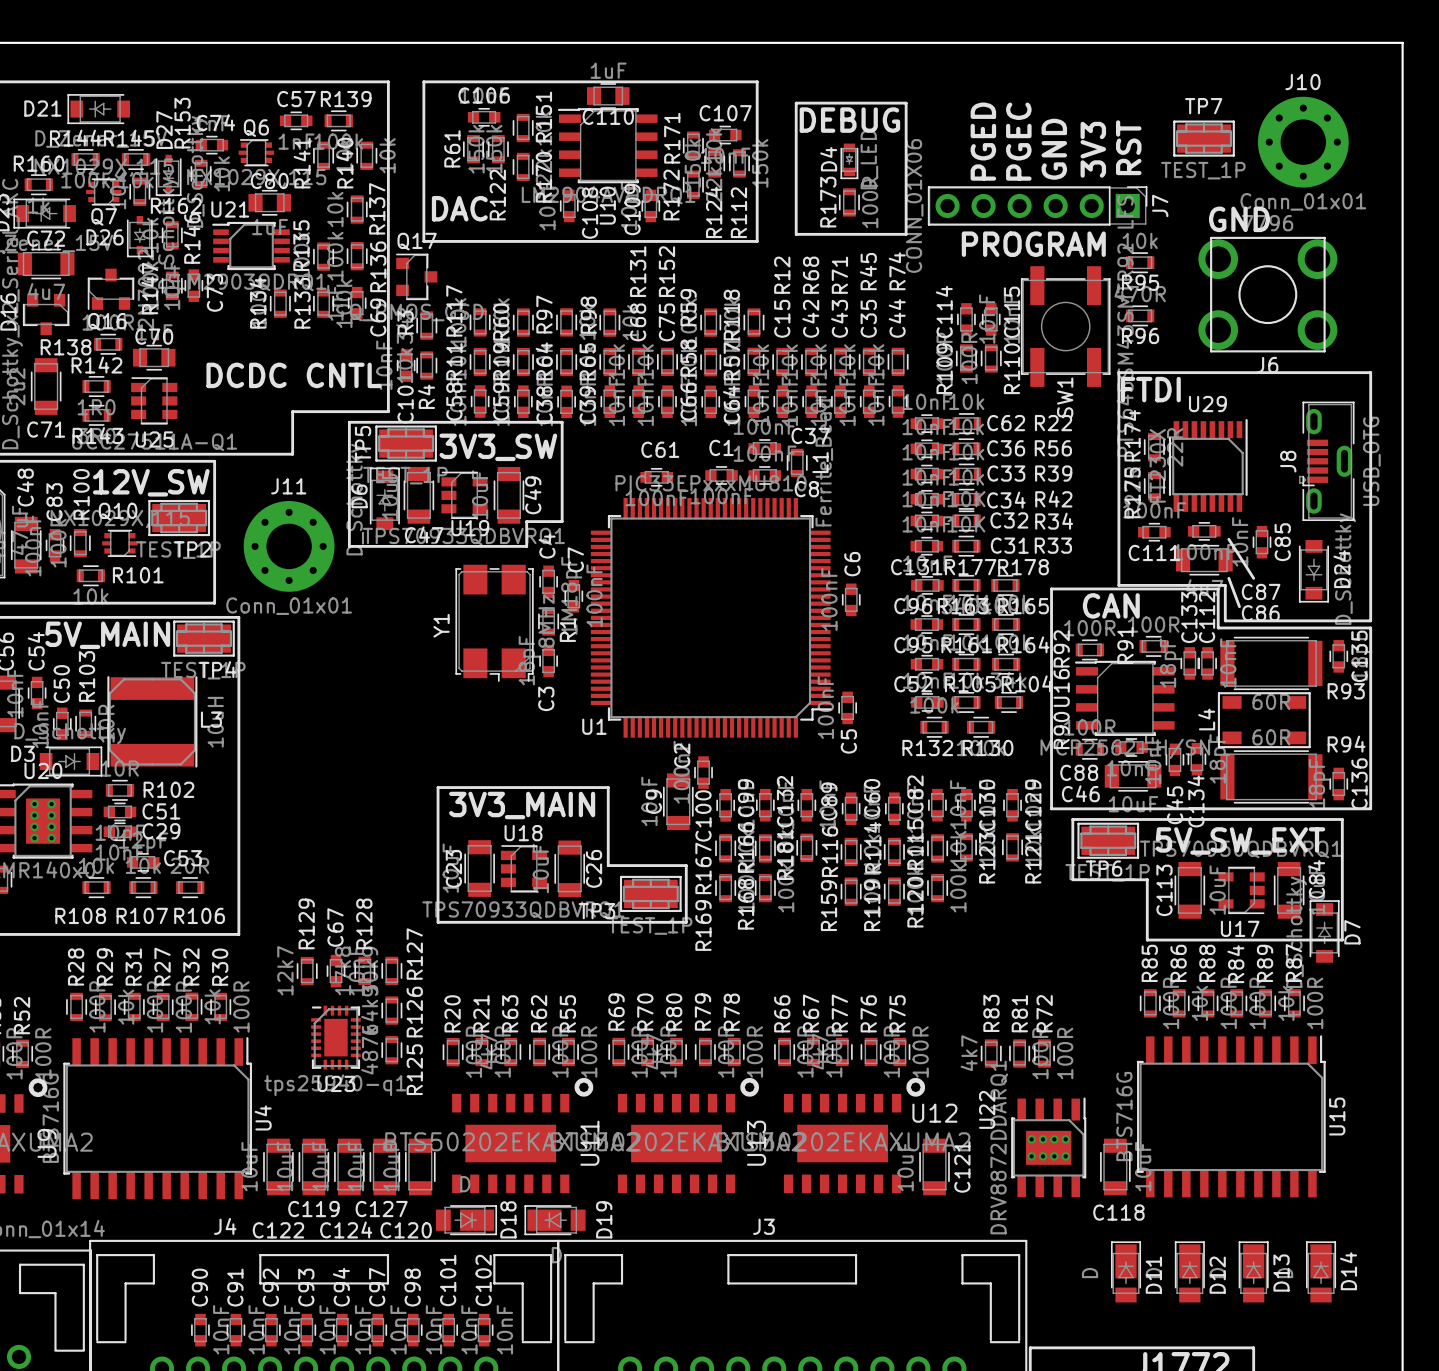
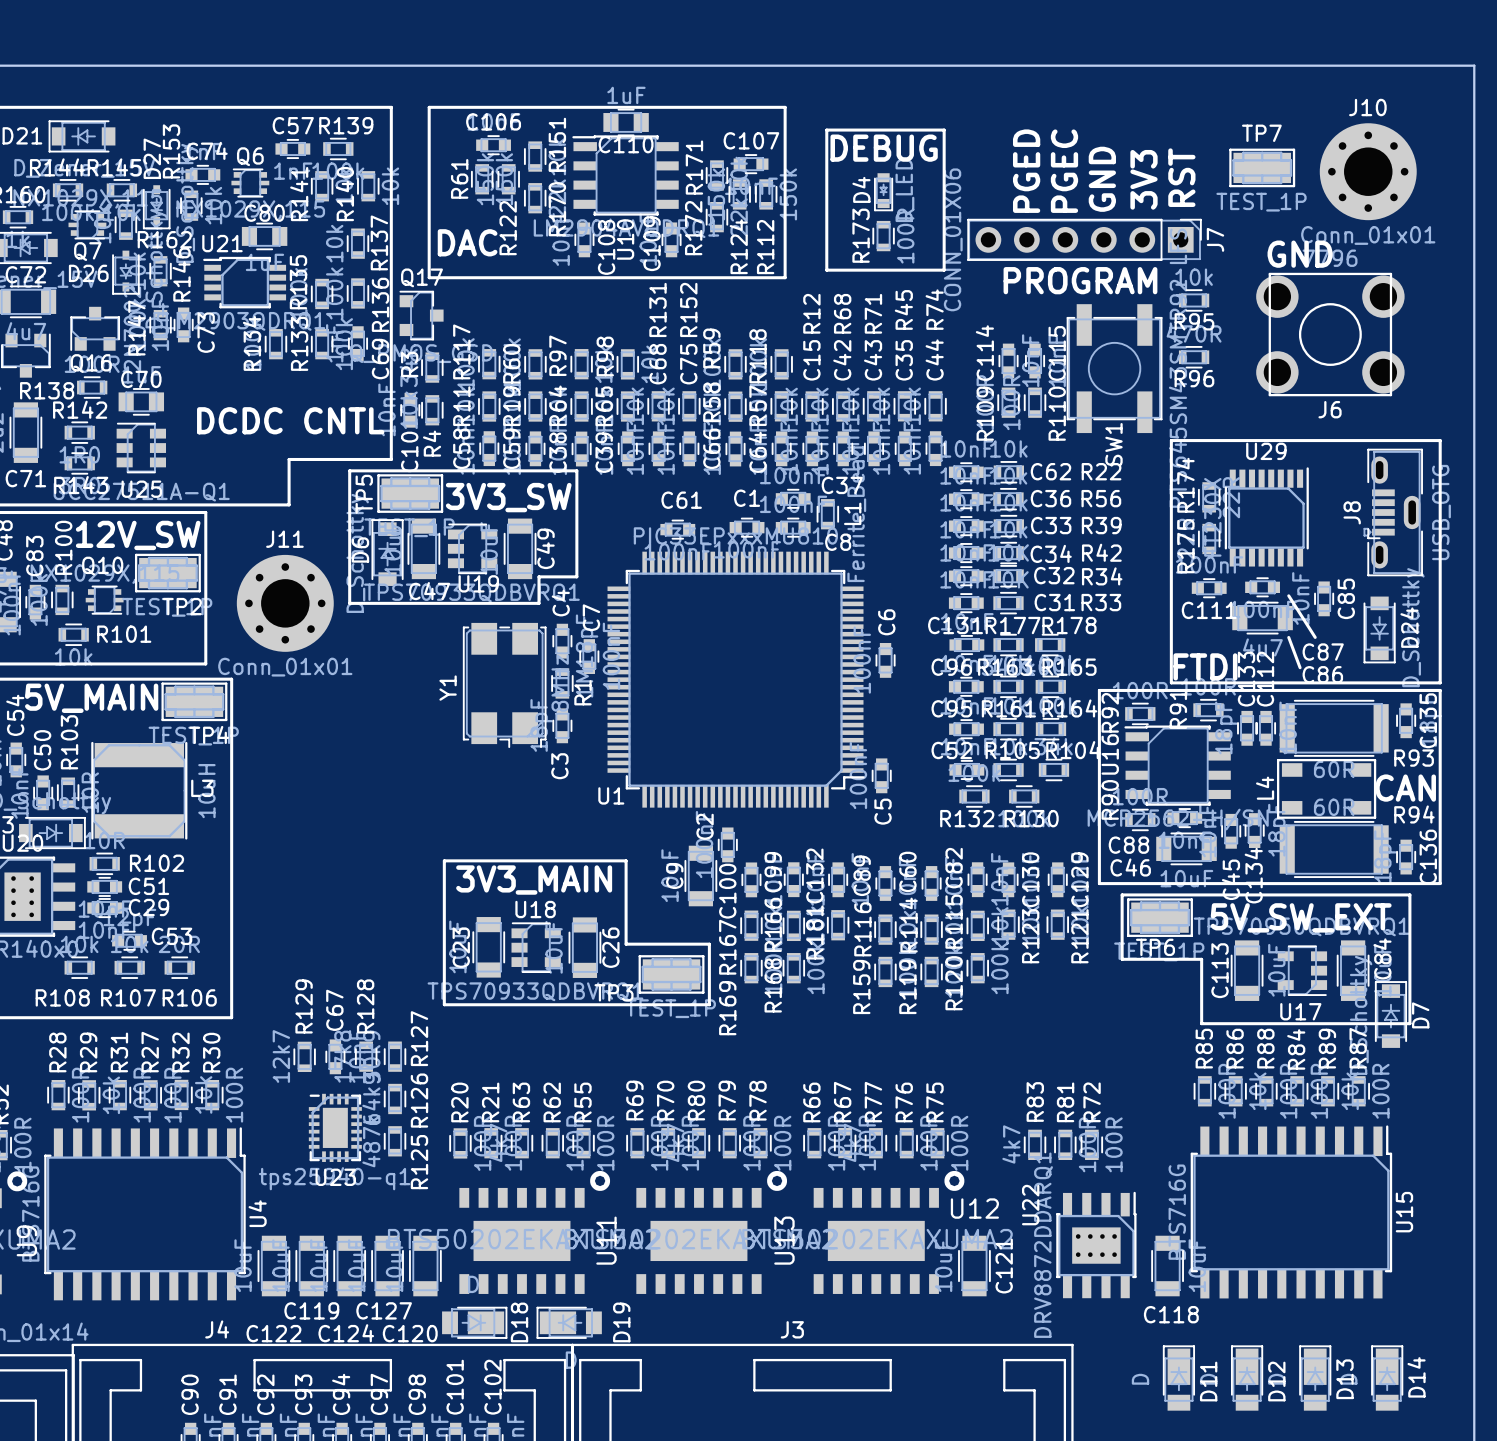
text position: FTDI (1150, 389) -> FTDI (1205, 666)
line: (1118, 393) (1118, 372) (1370, 372) (1370, 393) -> (1171, 440) (1440, 440)
line: (1118, 585) (1225, 585) (1225, 620) -> (1171, 645) (1171, 682) (1284, 682)
text position: CAN (1111, 605) -> CAN (1405, 788)
line: (1051, 627) (1051, 588) (1218, 588) (1218, 627) -> (1099, 690) (1277, 690)

